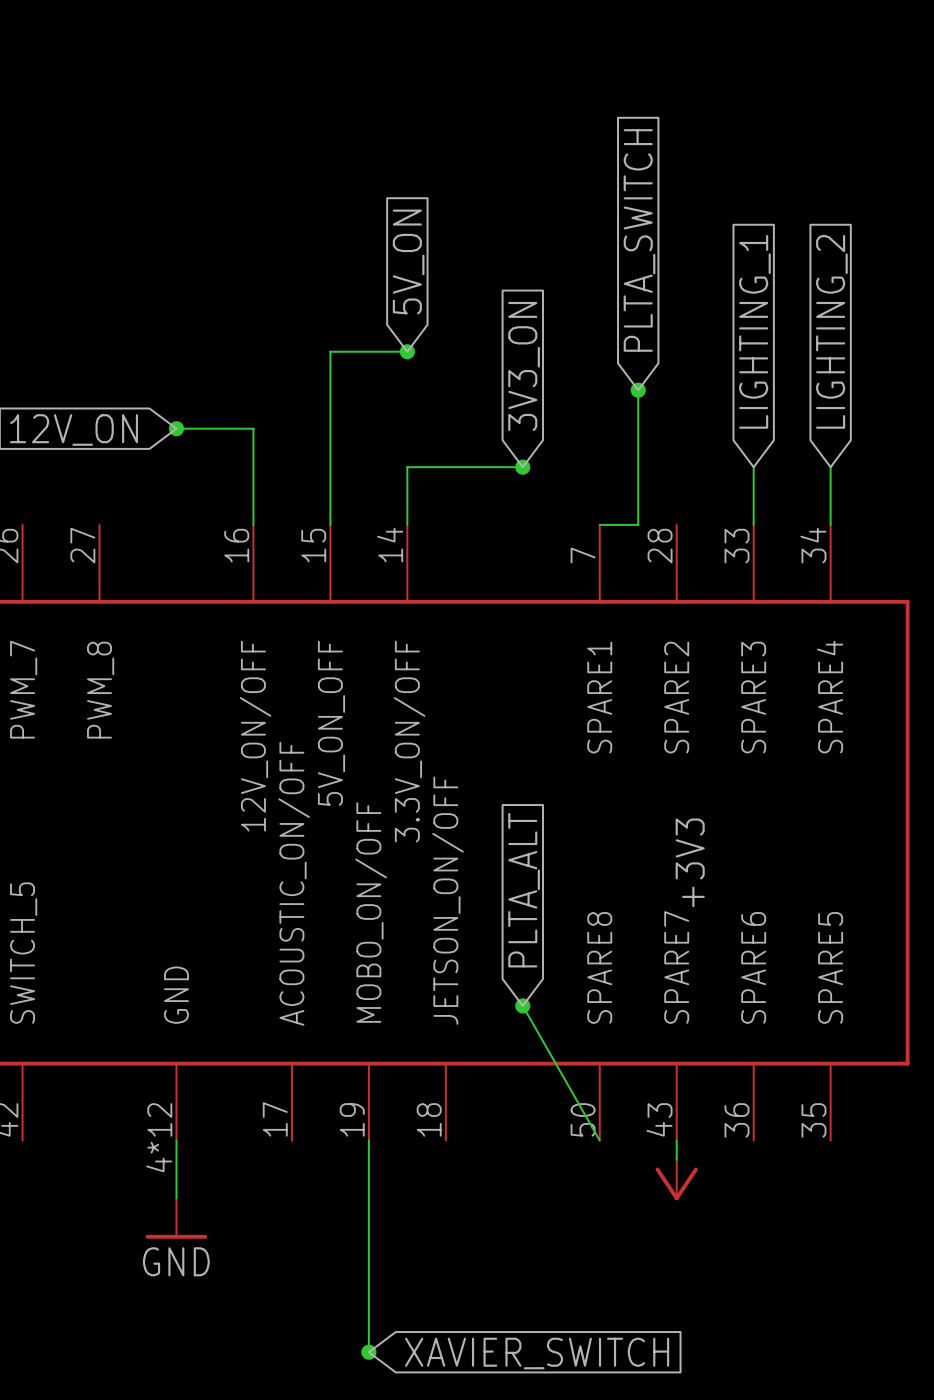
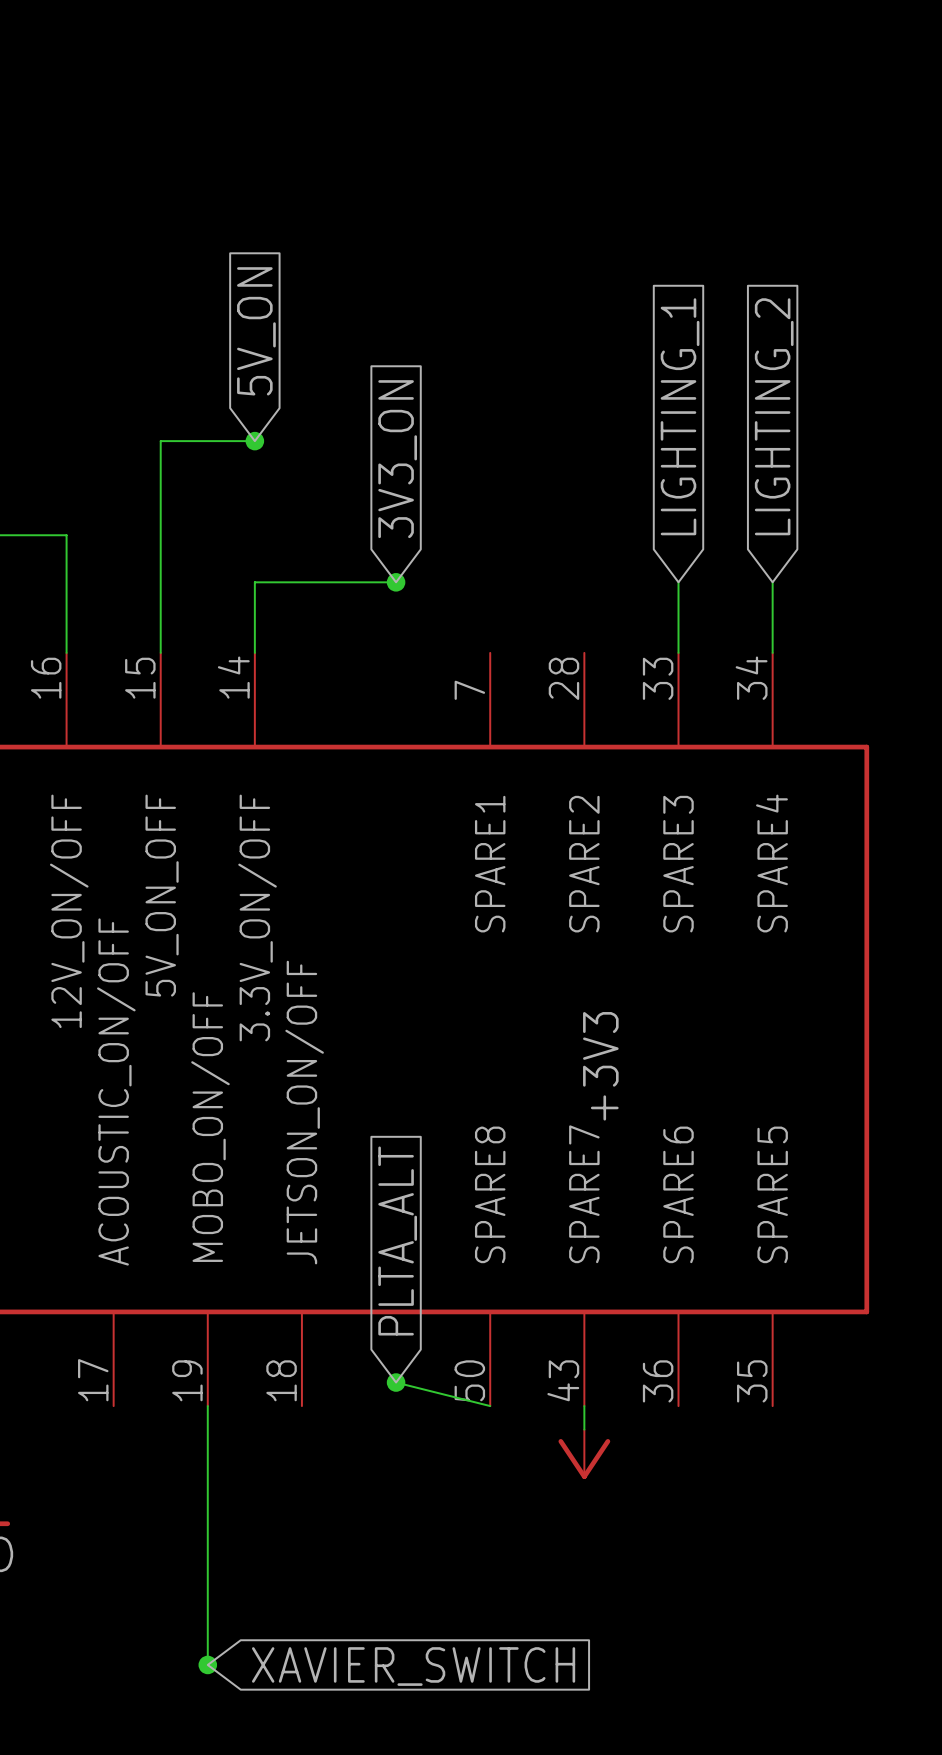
global label: PLTA_SWITCH (639, 240) -> none
wire: (638, 390) (638, 524) (599, 524) -> none
junction: (638, 390) -> none
global label position: PLTA_ALT (524, 890) -> PLTA_ALT (397, 1240)
wire: (522, 1005) (599, 1140) -> (396, 1382) (490, 1406)
junction: (522, 1005) -> none
junction: none -> (396, 1382)

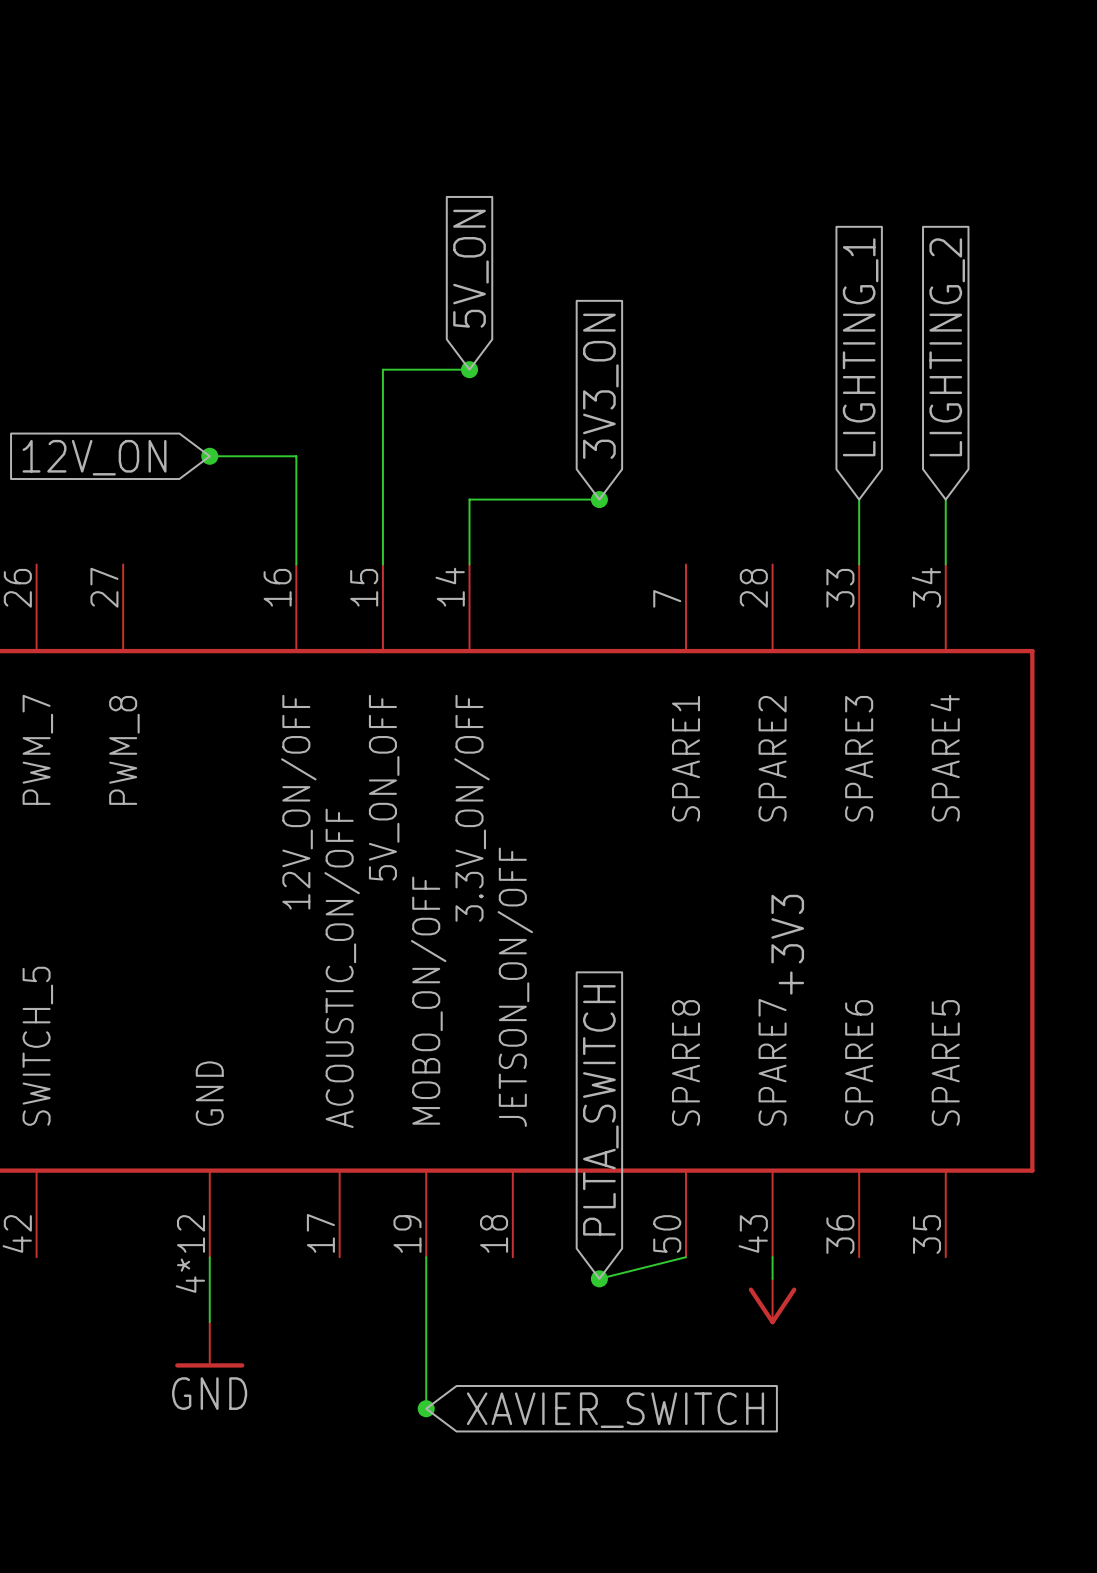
global label: PLTA_ALT (397, 1240) -> PLTA_SWITCH (600, 1110)
wire: (396, 1382) (490, 1406) -> (599, 1278) (685, 1257)
junction position: (396, 1382) -> (599, 1278)
wire: (207, 1570) (207, 1664) -> none
junction position: (207, 1664) -> (426, 1408)
global label position: XAVIER_SWITCH (413, 1666) -> XAVIER_SWITCH (615, 1410)

